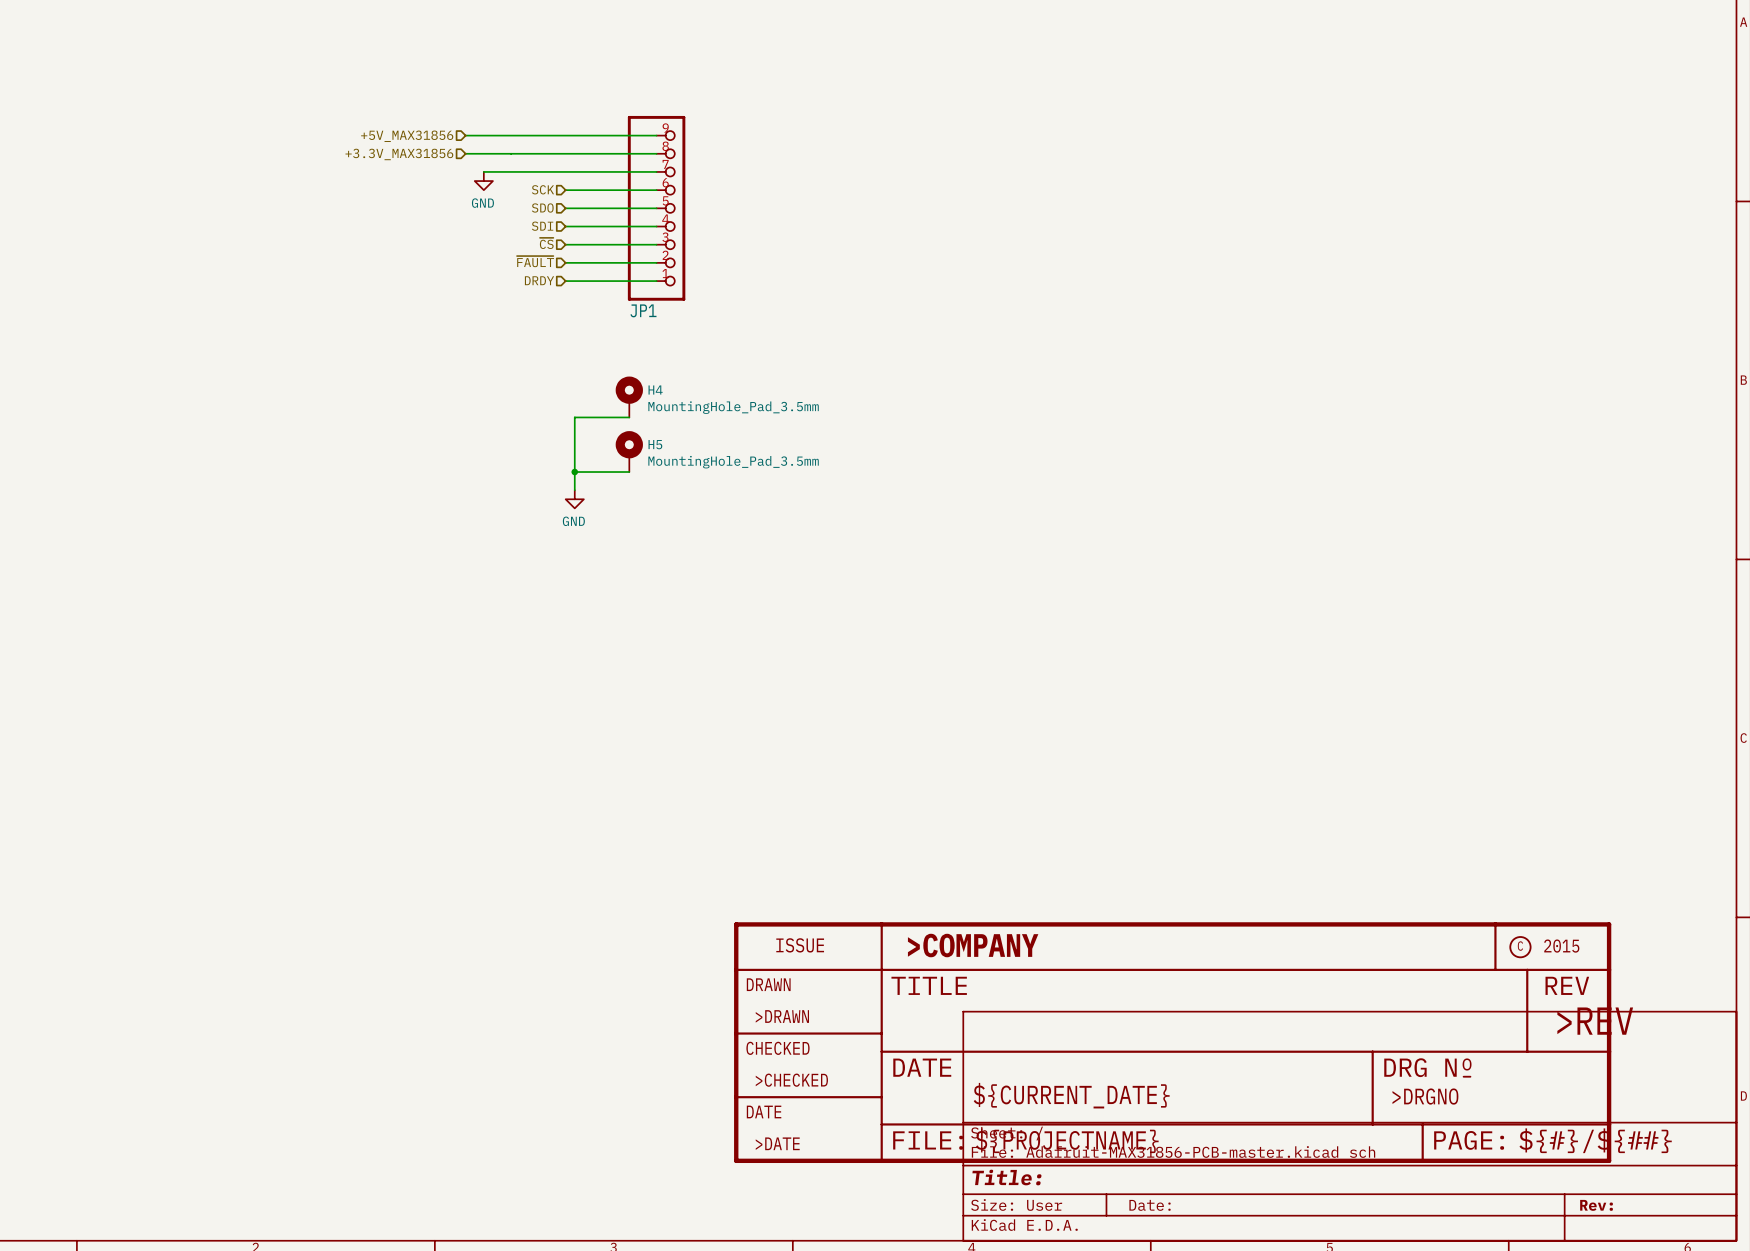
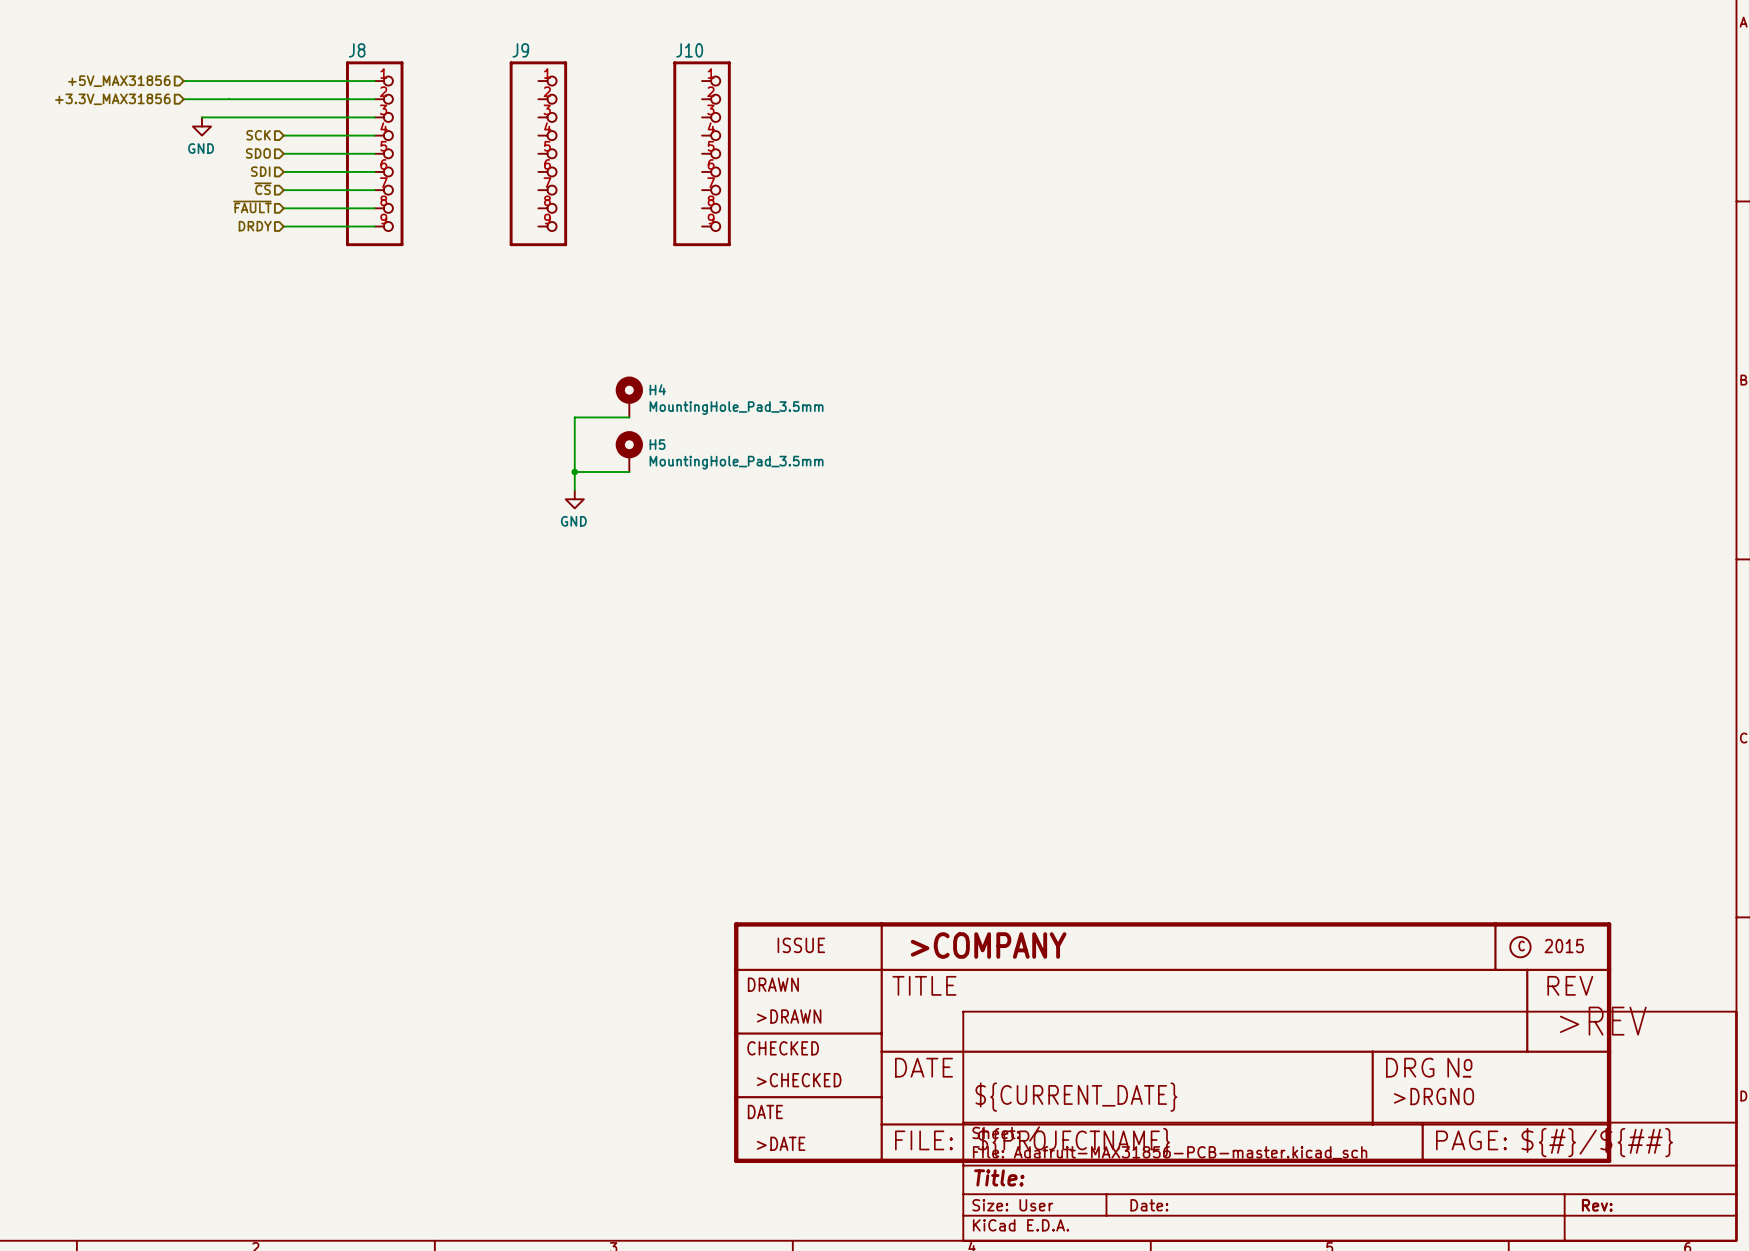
hierarchical label: none -> +5V_MAX31856 (119, 81)
wire: none -> (183, 81) (374, 81)
hierarchical label: none -> +3.3V_MAX31856 (112, 99)
wire: none -> (183, 99) (374, 99)
wire: none -> (201, 117) (374, 117)
power symbol: none -> GND (201, 126)
hierarchical label: none -> SCK (258, 135)
wire: none -> (283, 135) (374, 135)
wire: (465, 135) (656, 135) -> none
hierarchical label: +5V_MAX31856 (407, 136) -> none
hierarchical label: none -> SDO (258, 153)
wire: none -> (283, 153) (374, 153)
J8: none -> (374, 153)
wire: (465, 153) (656, 153) -> none
J9: none -> (538, 153)
J10: none -> (702, 153)
hierarchical label: +3.3V_MAX31856 (399, 154) -> none
hierarchical label: none -> SDI (260, 171)
wire: none -> (283, 171) (374, 171)
wire: (483, 171) (656, 171) -> none
power symbol: GND (483, 181) -> none
hierarchical label: none -> ~{CS} (263, 188)
hierarchical label: SCK (542, 189) -> none
wire: none -> (283, 190) (374, 190)
wire: (565, 190) (656, 190) -> none
hierarchical label: none -> ~{FAULT} (252, 206)
wire: none -> (283, 208) (374, 208)
hierarchical label: SDO (542, 208) -> none
wire: (565, 208) (656, 208) -> none
JP1: (656, 208) -> none
hierarchical label: none -> DRDY (255, 226)
wire: none -> (283, 226) (374, 226)
hierarchical label: SDI (542, 226) -> none
wire: (565, 226) (656, 226) -> none
hierarchical label: ~{CS} (546, 243) -> none
wire: (565, 244) (656, 244) -> none
hierarchical label: ~{FAULT} (535, 261) -> none
wire: (565, 262) (656, 262) -> none
hierarchical label: DRDY (539, 280) -> none
wire: (565, 281) (656, 281) -> none

